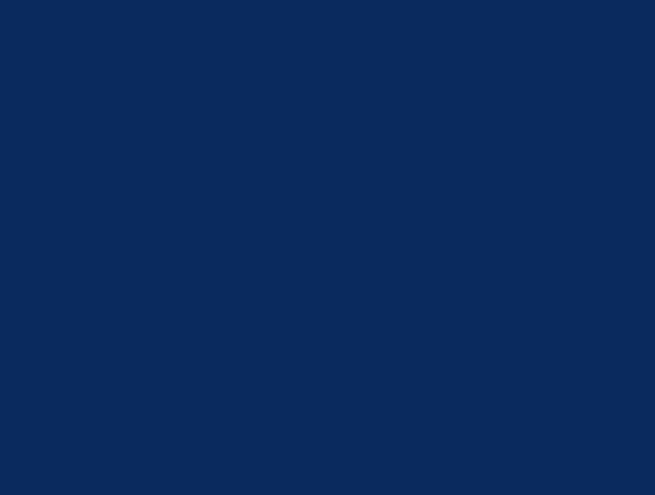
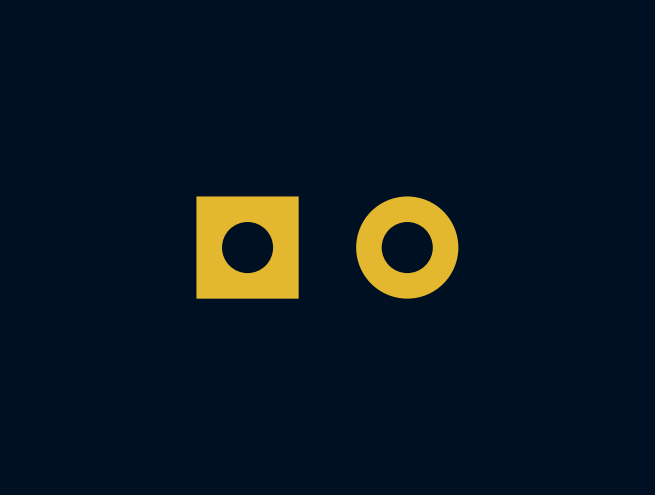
part: none -> (327, 247)

